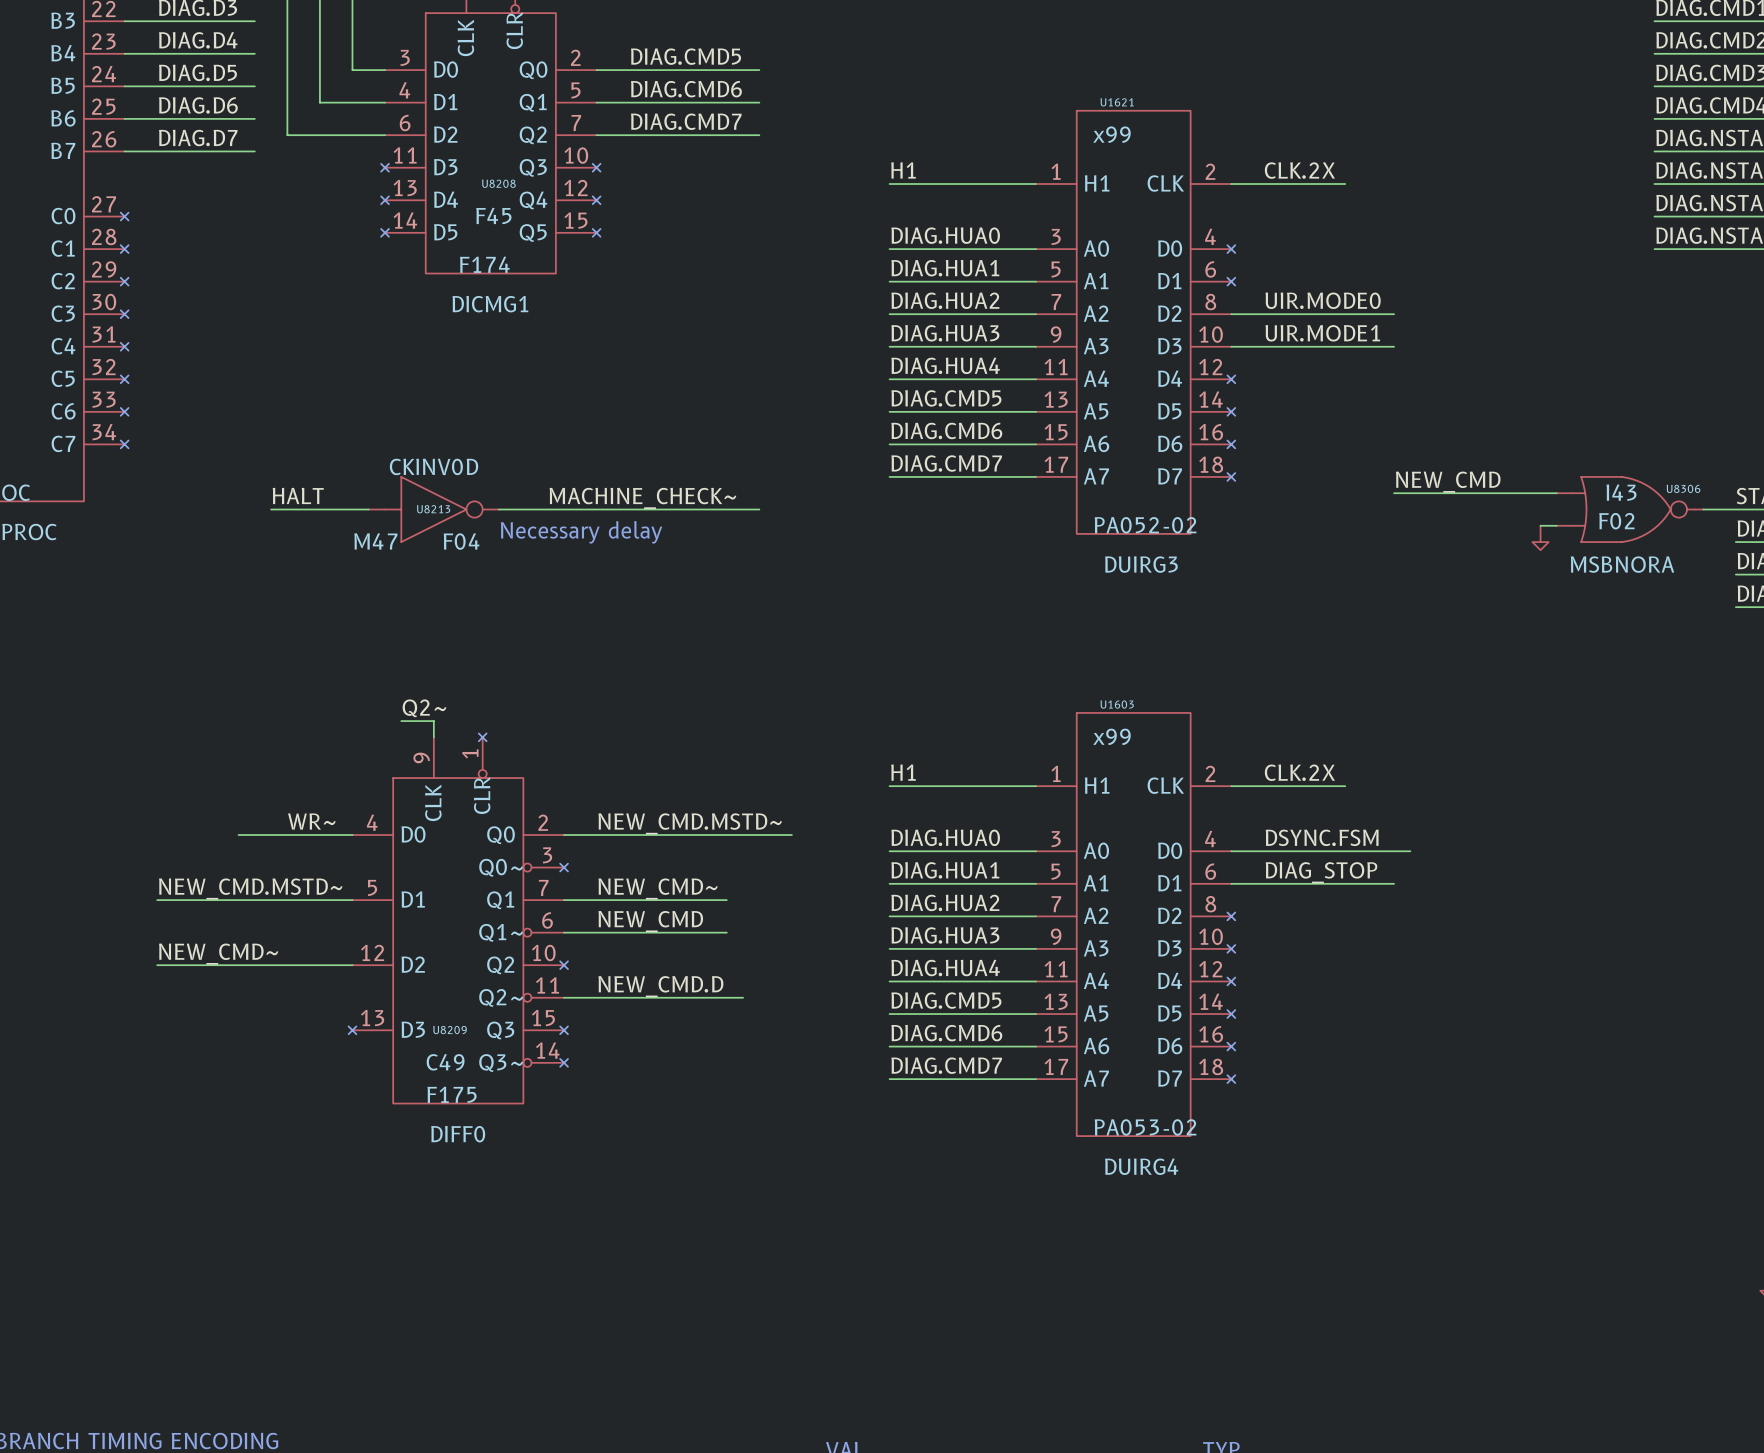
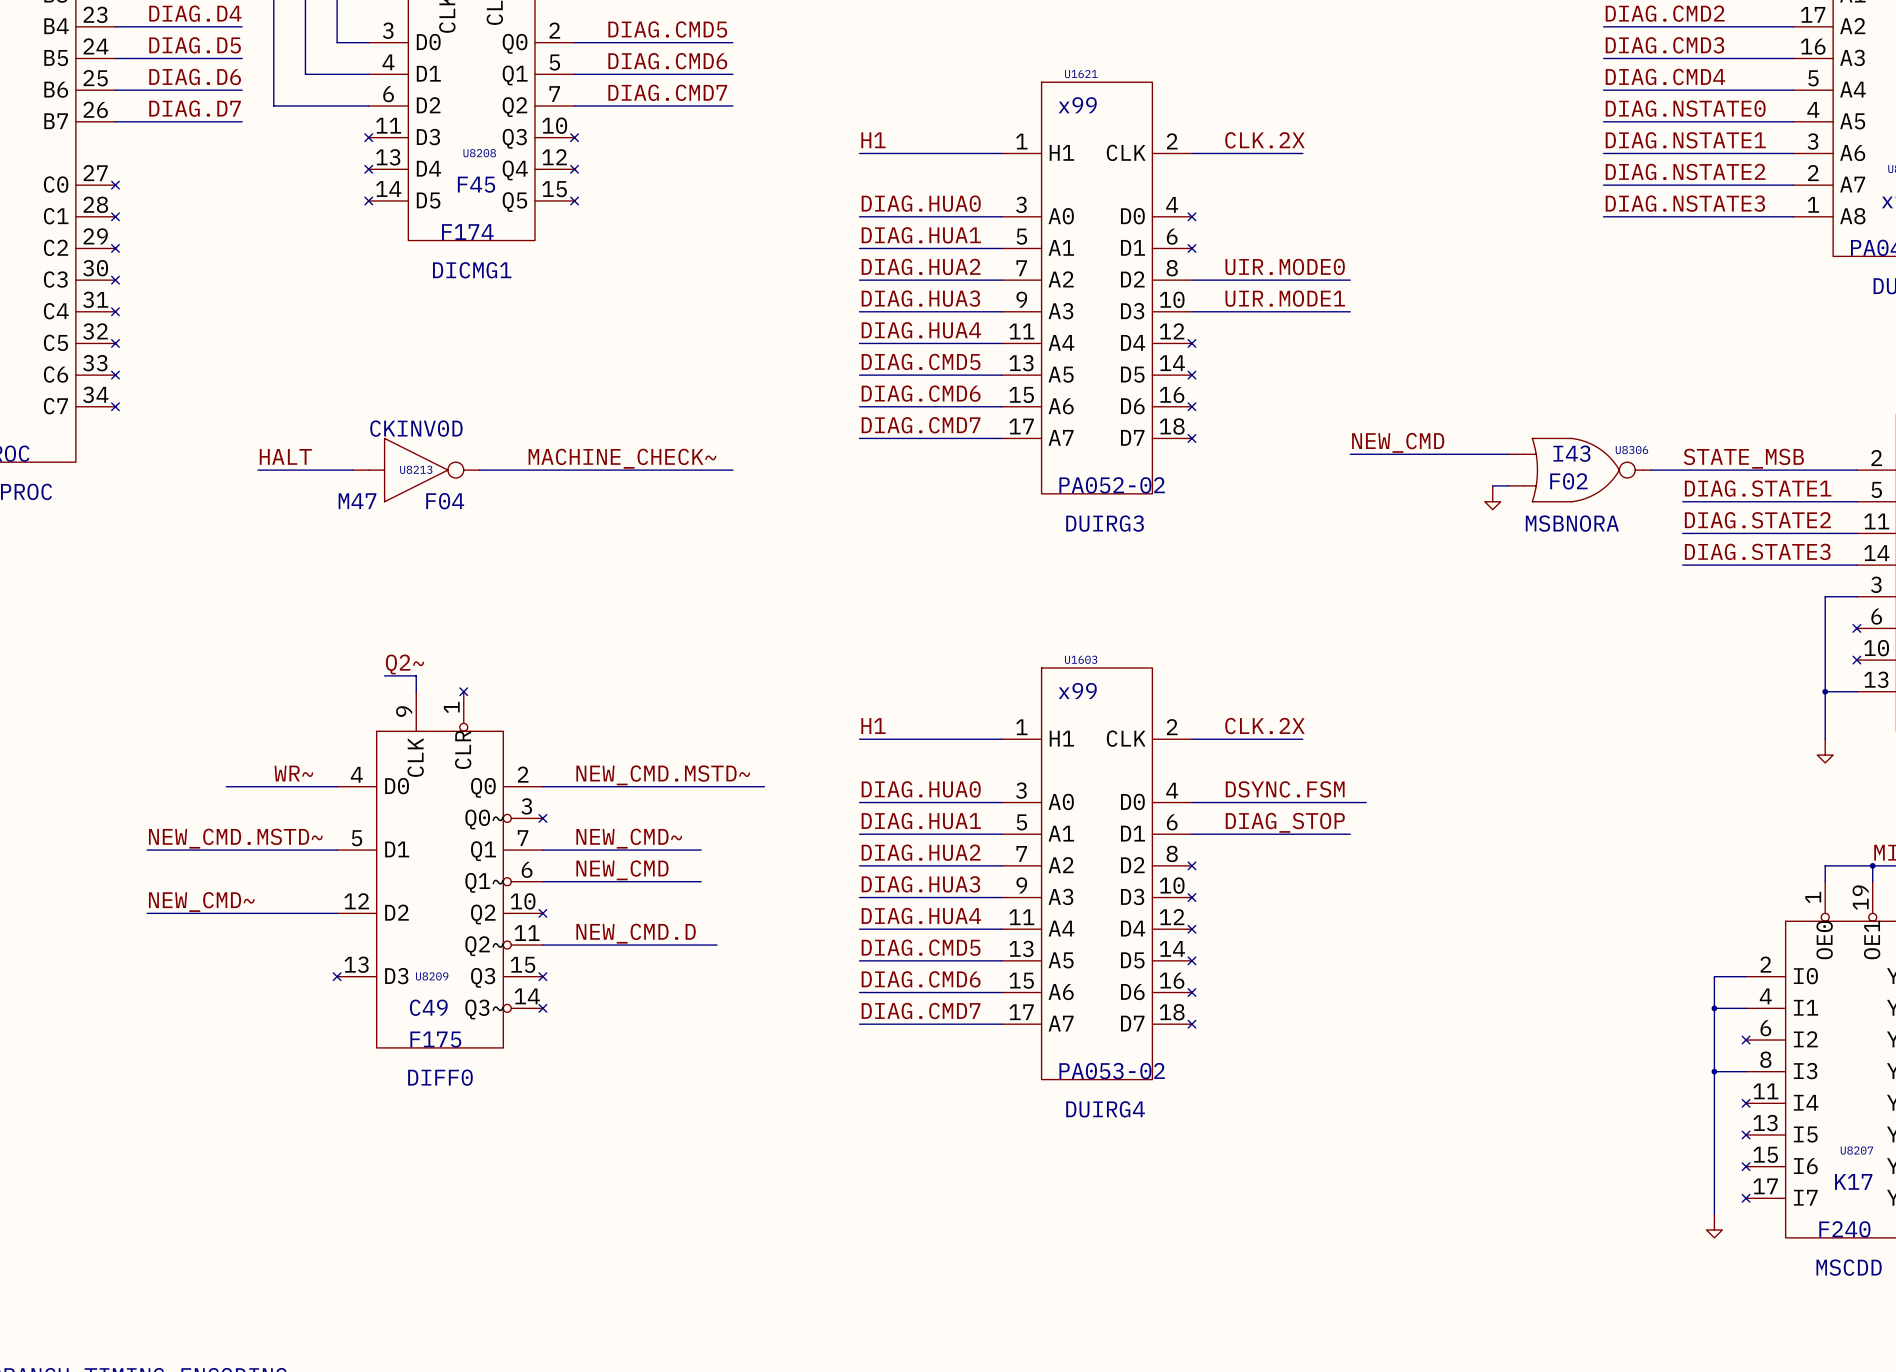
text: Necessary delay (581, 532) -> none

